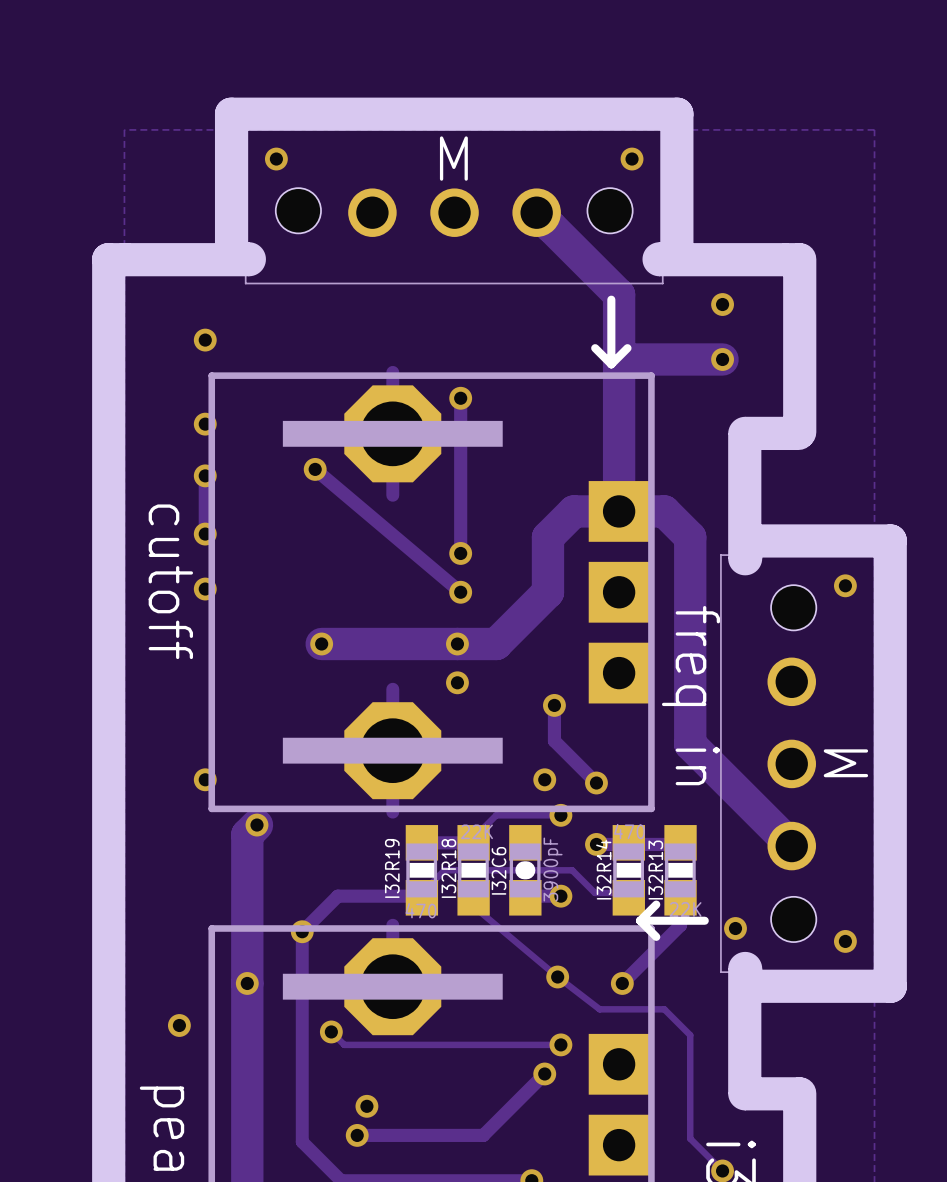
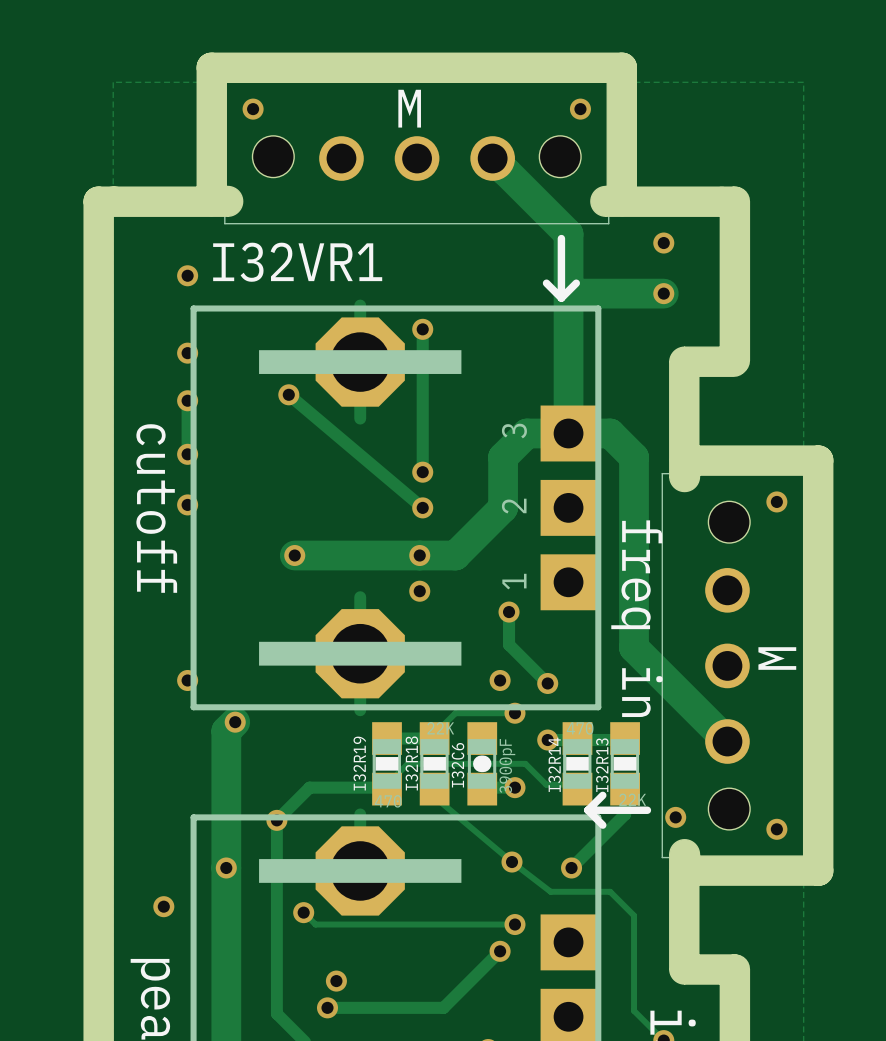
I32VR1 name: none -> I32VR1 (297, 262)
I32VR1 text: none -> 3 (514, 431)
I32VR1 text: none -> 2 (514, 506)
I32VR1 text: none -> 1 (514, 581)

